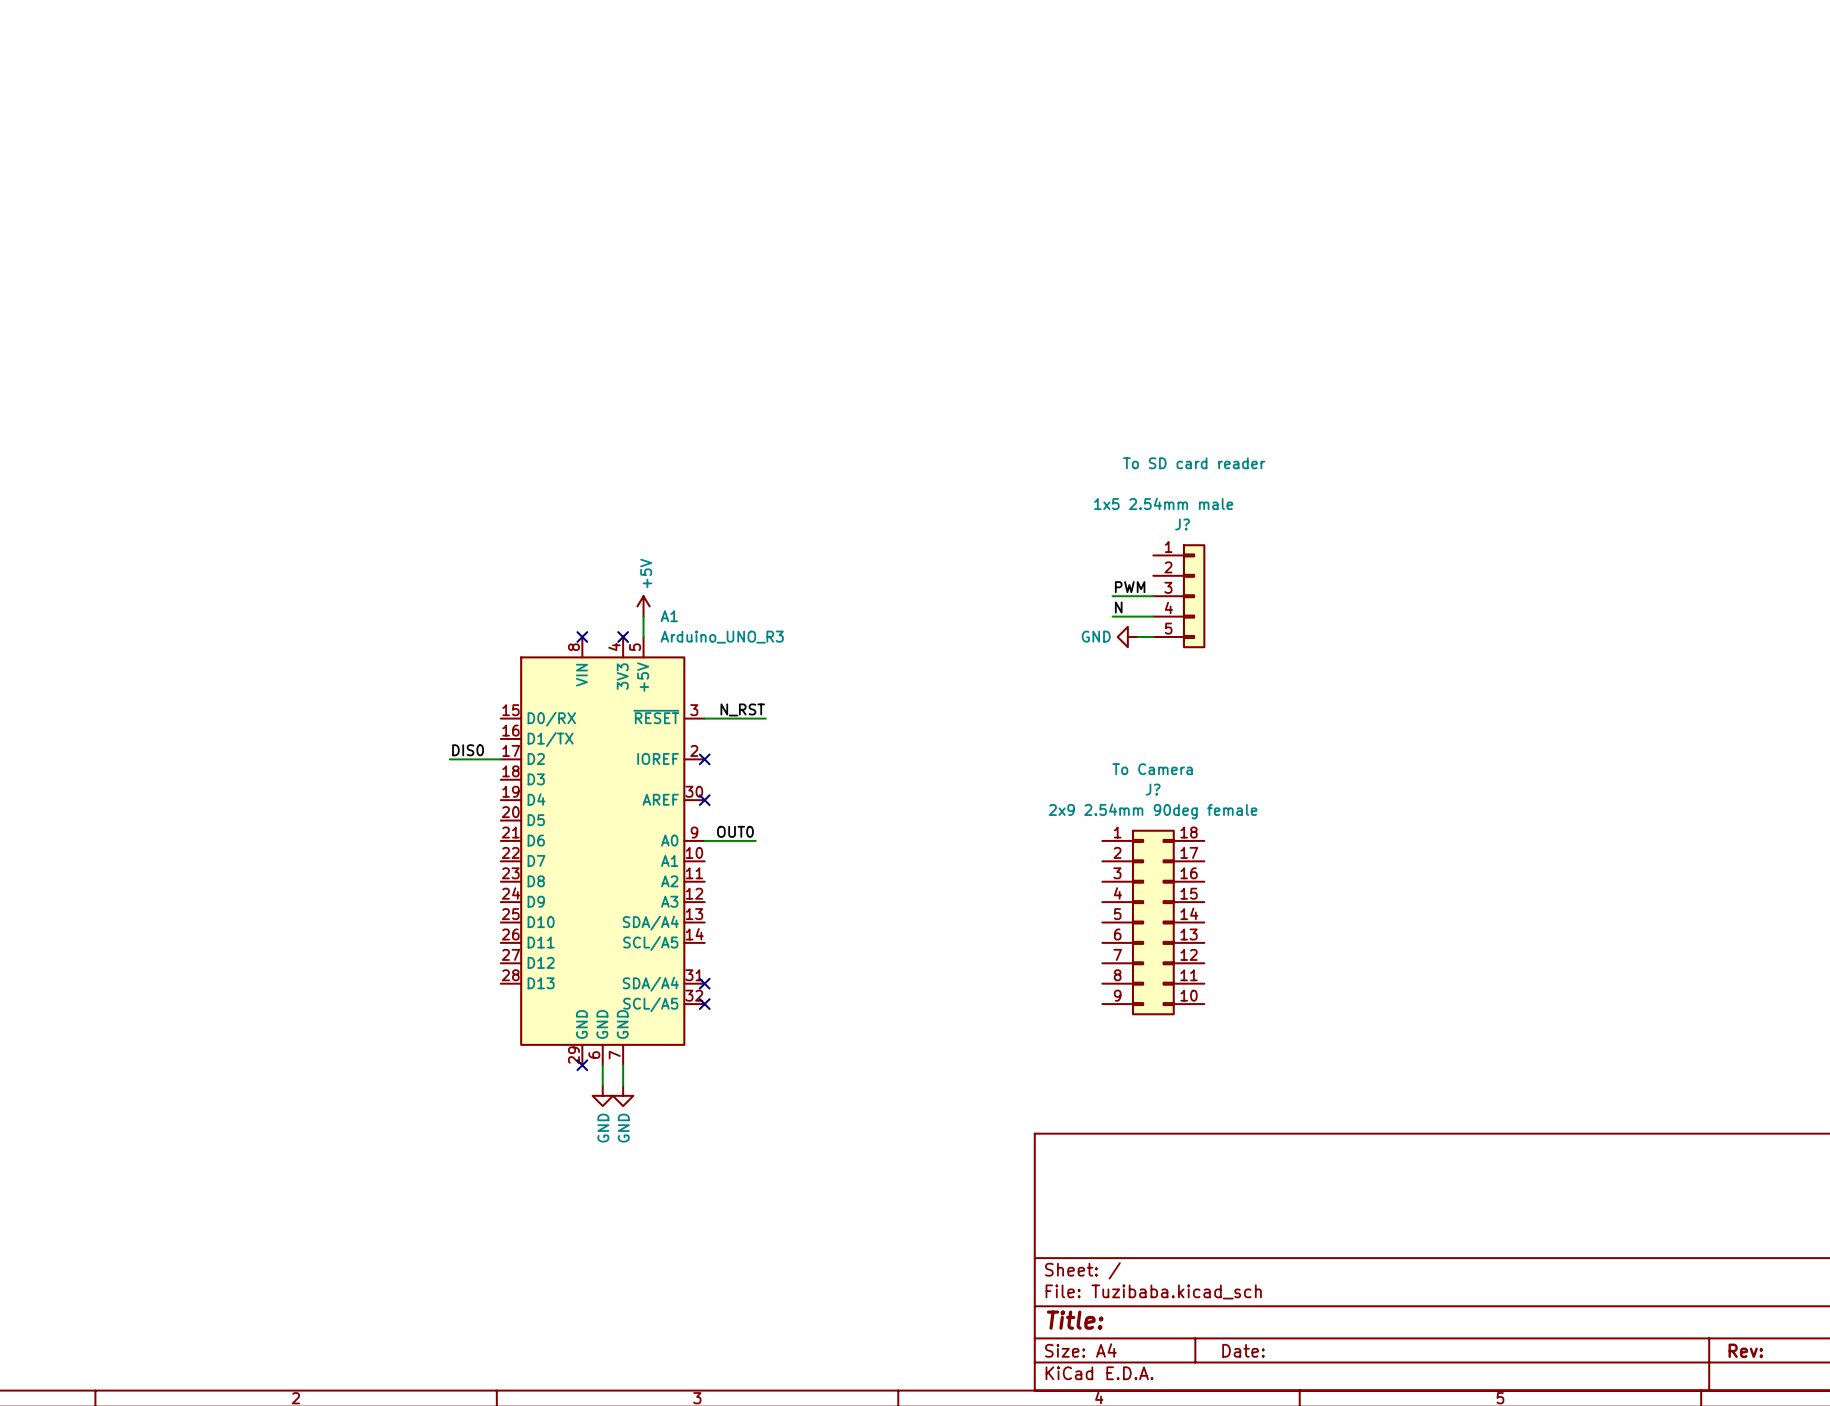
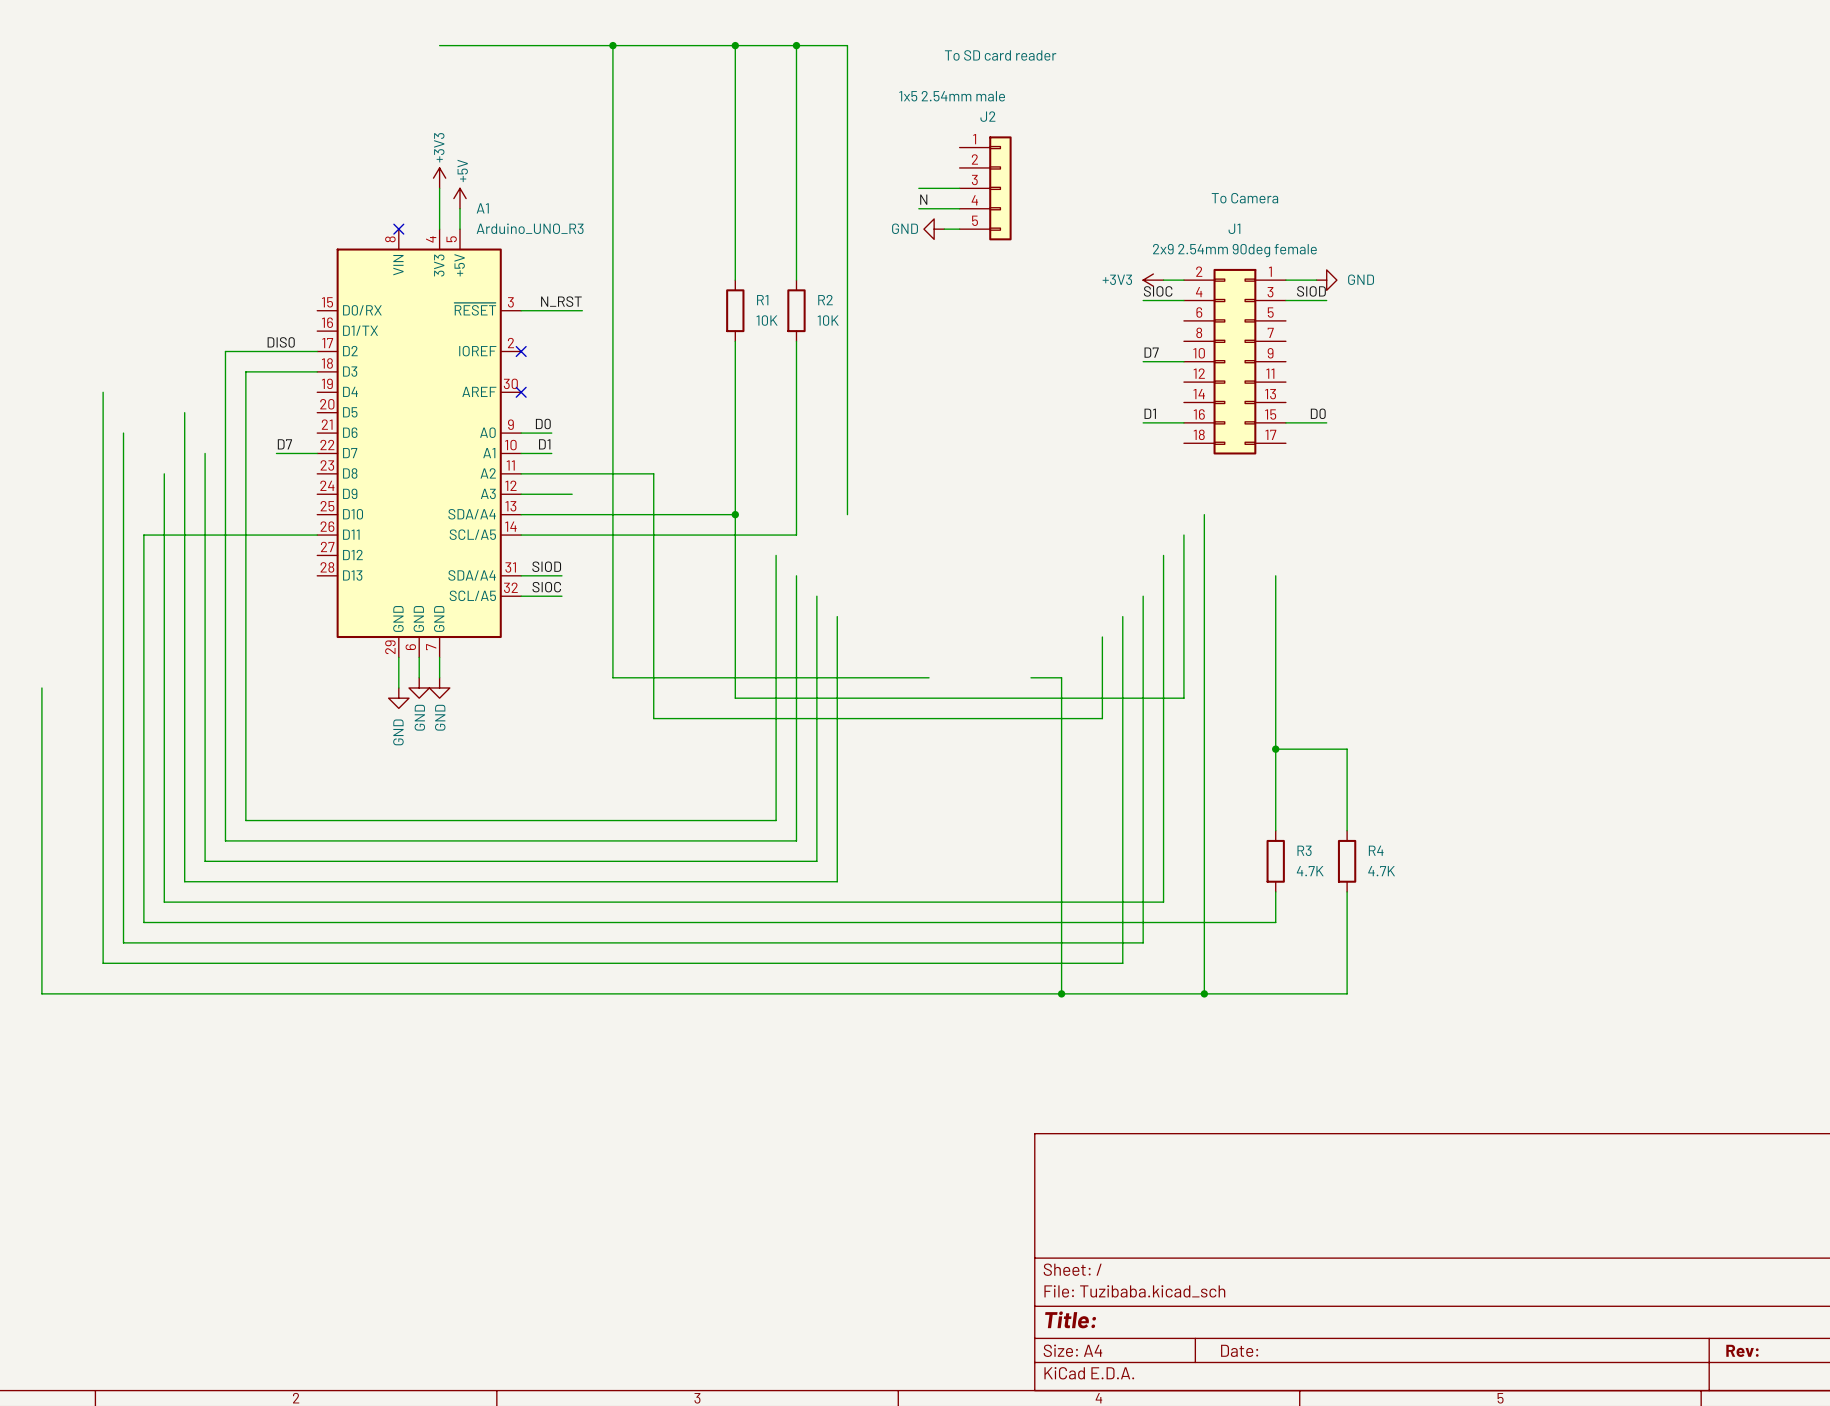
wire: none -> (439, 45) (847, 45) (847, 514)
wire: none -> (612, 45) (612, 677) (929, 677)
junction: none -> (612, 45)
wire: none -> (735, 45) (735, 280)
junction: none -> (735, 45)
wire: none -> (796, 45) (796, 280)
junction: none -> (796, 45)
power symbol: none -> +3V3 (439, 178)
wire: none -> (439, 188) (439, 229)
wire: none -> (918, 188) (959, 188)
J2: none -> 1x5 2.54mm male (985, 188)
power symbol: none -> +5V (459, 198)
label: none -> N (923, 199)
wire: none -> (459, 208) (459, 229)
wire: none -> (918, 208) (959, 208)
no-connect mark: none -> (398, 229)
power symbol: none -> GND (934, 229)
wire: none -> (944, 229) (959, 229)
power symbol: none -> +3V3 (1153, 280)
wire: none -> (1163, 280) (1183, 280)
wire: none -> (1285, 280) (1316, 280)
power symbol: none -> GND (1326, 280)
label: none -> SIOC (1158, 291)
label: none -> SIOD (1311, 291)
wire: none -> (1143, 300) (1183, 300)
wire: none -> (1285, 300) (1326, 300)
label: none -> N_RST (561, 301)
wire: none -> (521, 310) (582, 310)
R1: none -> 10K (735, 310)
R2: none -> 10K (796, 310)
wire: none -> (735, 341) (735, 698) (1183, 698) (1183, 535)
wire: none -> (796, 341) (796, 535) (521, 535)
label: none -> DIS0 (281, 342)
wire: none -> (317, 351) (225, 351) (225, 840) (704, 840)
no-connect mark: none -> (521, 351)
label: none -> D7 (1151, 352)
wire: none -> (1143, 361) (1183, 361)
J1: none -> 2x9 2.54mm 90deg female (1234, 361)
wire: none -> (317, 371) (245, 371) (245, 820) (776, 820) (776, 555)
wire: none -> (103, 392) (103, 963) (1122, 963) (1122, 616)
no-connect mark: none -> (521, 392)
wire: none -> (184, 412) (184, 881) (837, 881) (837, 616)
label: none -> D1 (1150, 413)
label: none -> D0 (1318, 413)
wire: none -> (1285, 422) (1326, 422)
label: none -> D0 (543, 423)
wire: none -> (123, 433) (123, 942) (1143, 942) (1143, 596)
wire: none -> (521, 433) (551, 433)
label: none -> D7 (284, 444)
label: none -> D1 (544, 444)
wire: none -> (205, 453) (205, 861) (816, 861) (816, 596)
wire: none -> (276, 453) (317, 453)
wire: none -> (521, 453) (551, 453)
wire: none -> (164, 473) (164, 902) (1163, 902) (1163, 555)
wire: none -> (521, 473) (653, 473) (653, 718) (704, 718)
wire: none -> (521, 494) (572, 494)
wire: none -> (521, 514) (735, 514)
junction: none -> (735, 514)
wire: none -> (1204, 514) (1204, 993)
wire: none -> (317, 535) (143, 535) (143, 922) (1275, 922) (1275, 891)
label: none -> SIOD (546, 566)
wire: none -> (521, 575) (561, 575)
wire: none -> (796, 575) (796, 840) (755, 840)
wire: none -> (1275, 575) (1275, 830)
label: none -> SIOC (546, 587)
label: PWM (1130, 587) -> none
wire: none -> (521, 596) (561, 596)
wire: (1112, 596) (1153, 596) -> (1143, 422) (1183, 422)
J?: 1x5 2.54mm male (1179, 596) -> none
power symbol: +5V (643, 606) -> none
label: N (1118, 607) -> none
wire: (643, 616) (643, 637) -> none
wire: (1112, 616) (1153, 616) -> none
no-connect mark: (582, 637) -> none
no-connect mark: (623, 637) -> none
wire: none -> (1102, 637) (1102, 718) (765, 718)
power symbol: GND (1127, 637) -> none
wire: (1138, 637) (1153, 637) -> none
wire: none -> (398, 657) (398, 687)
wire: none -> (419, 657) (419, 677)
wire: none -> (439, 657) (439, 677)
wire: none -> (1031, 677) (1061, 677) (1061, 993)
wire: none -> (41, 687) (41, 993) (1347, 993) (1347, 891)
power symbol: none -> GND (419, 687)
power symbol: none -> GND (439, 687)
power symbol: none -> GND (398, 698)
label: N_RST (742, 709) -> none
wire: none -> (1275, 749) (1347, 749) (1347, 830)
junction: none -> (1275, 749)
label: DIS0 (468, 750) -> none
wire: (449, 759) (500, 759) -> none
no-connect mark: (704, 759) -> none
no-connect mark: (704, 800) -> none
label: OUT0 (735, 831) -> none
A1 position: (602, 851) -> (419, 443)
R3: none -> 4.7K (1275, 861)
R4: none -> 4.7K (1347, 861)
J?: 2x9 2.54mm 90deg female (1153, 922) -> none
no-connect mark: (704, 983) -> none
junction: none -> (1061, 993)
junction: none -> (1204, 993)
no-connect mark: (704, 1004) -> none
no-connect mark: (582, 1065) -> none
wire: (602, 1065) (602, 1085) -> none
wire: (623, 1065) (623, 1085) -> none
power symbol: GND (602, 1095) -> none
power symbol: GND (623, 1095) -> none

